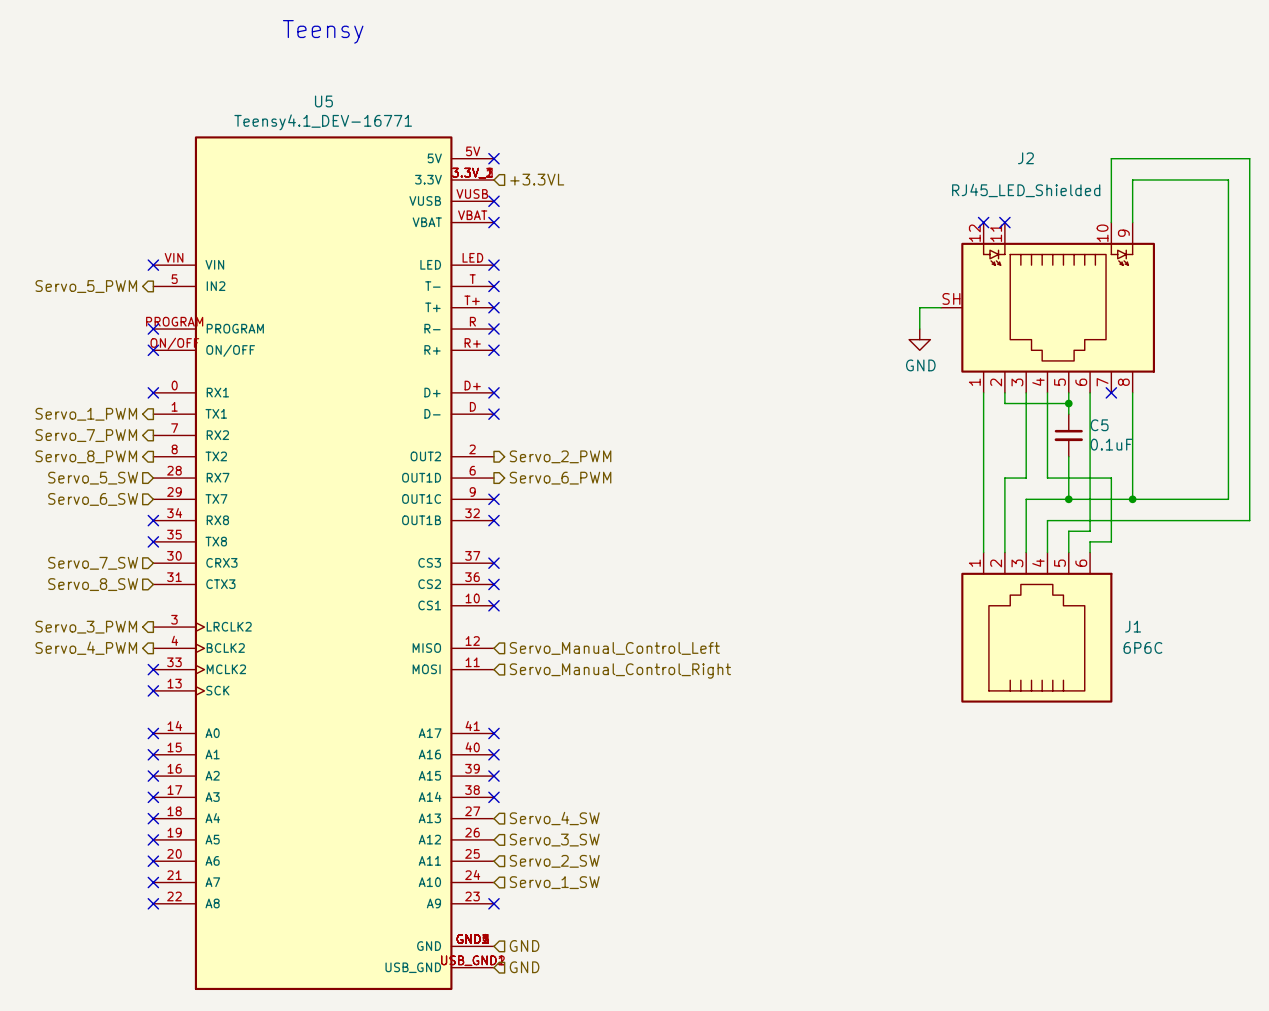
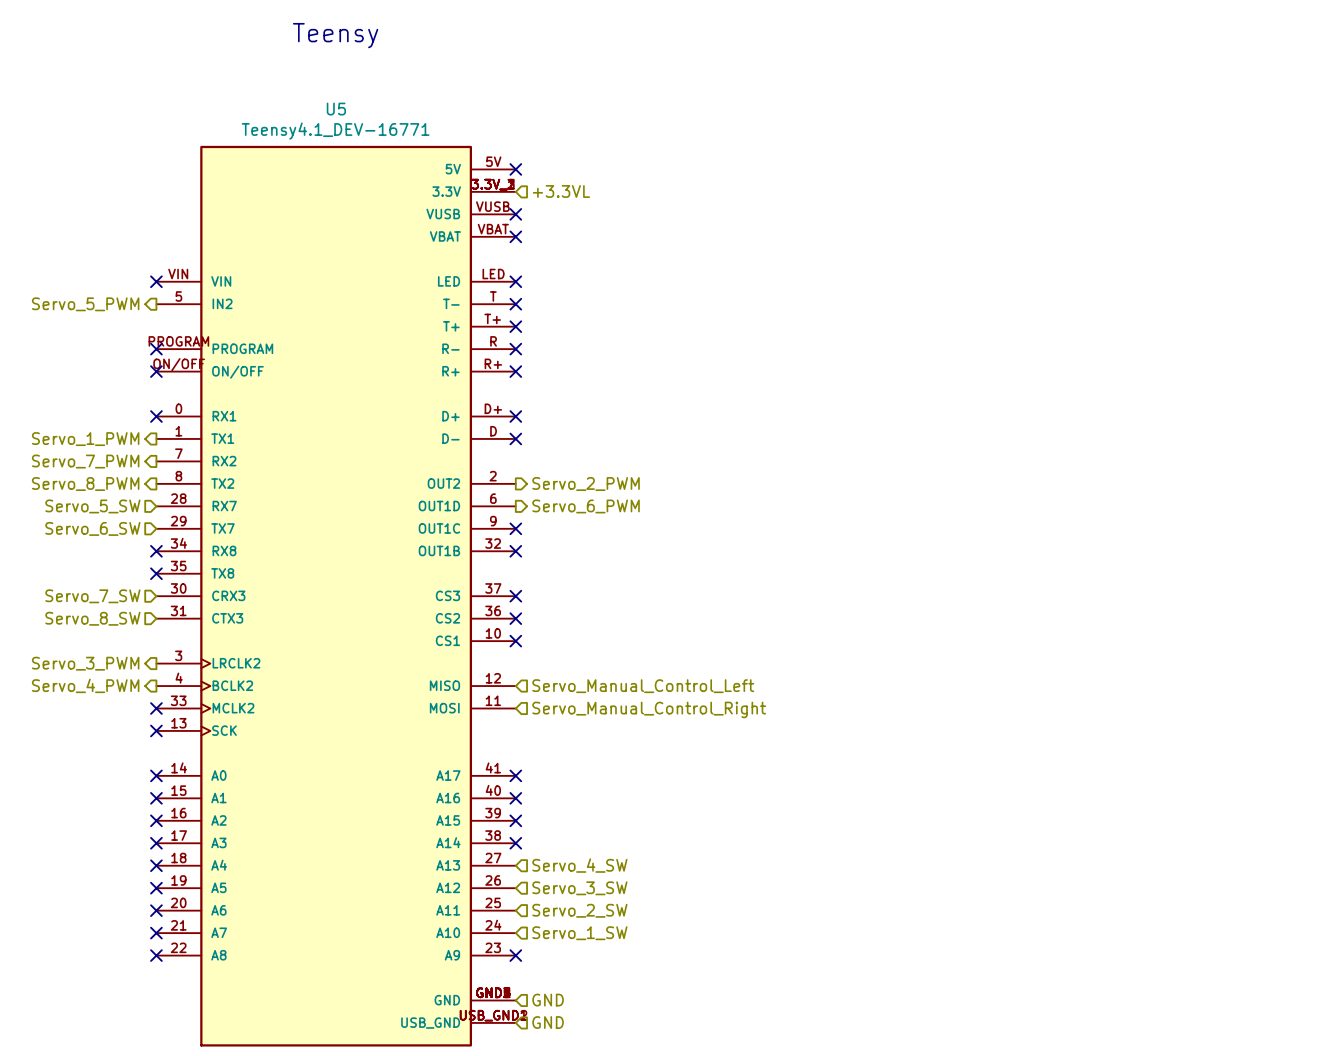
no-connect mark: (983, 222) -> none
no-connect mark: (1004, 222) -> none
wire: (1111, 222) (1111, 158) (1249, 158) (1249, 520) (1047, 520) (1047, 552) -> none
wire: (1132, 222) (1132, 179) (1228, 179) (1228, 499) (1026, 499) (1026, 552) -> none
wire: (941, 307) (919, 307) (919, 329) -> none
J2: RJ45_LED_Shielded (1048, 307) -> none
power symbol: GND (919, 339) -> none
wire: (983, 392) (983, 552) -> none
wire: (1004, 392) (1004, 403) (1068, 403) -> none
wire: (1026, 392) (1026, 478) (1004, 478) (1004, 552) -> none
wire: (1047, 392) (1047, 478) (1111, 478) (1111, 541) (1090, 541) (1090, 552) -> none
wire: (1068, 392) (1068, 414) -> none
wire: (1090, 392) (1090, 531) (1068, 531) (1068, 552) -> none
no-connect mark: (1111, 392) -> none
wire: (1132, 392) (1132, 499) -> none
junction: (1068, 403) -> none
C5: 0.1uF (1068, 435) -> none
wire: (1068, 456) (1068, 499) -> none
junction: (1068, 499) -> none
junction: (1132, 499) -> none
J1: 6P6C (1036, 627) -> none

